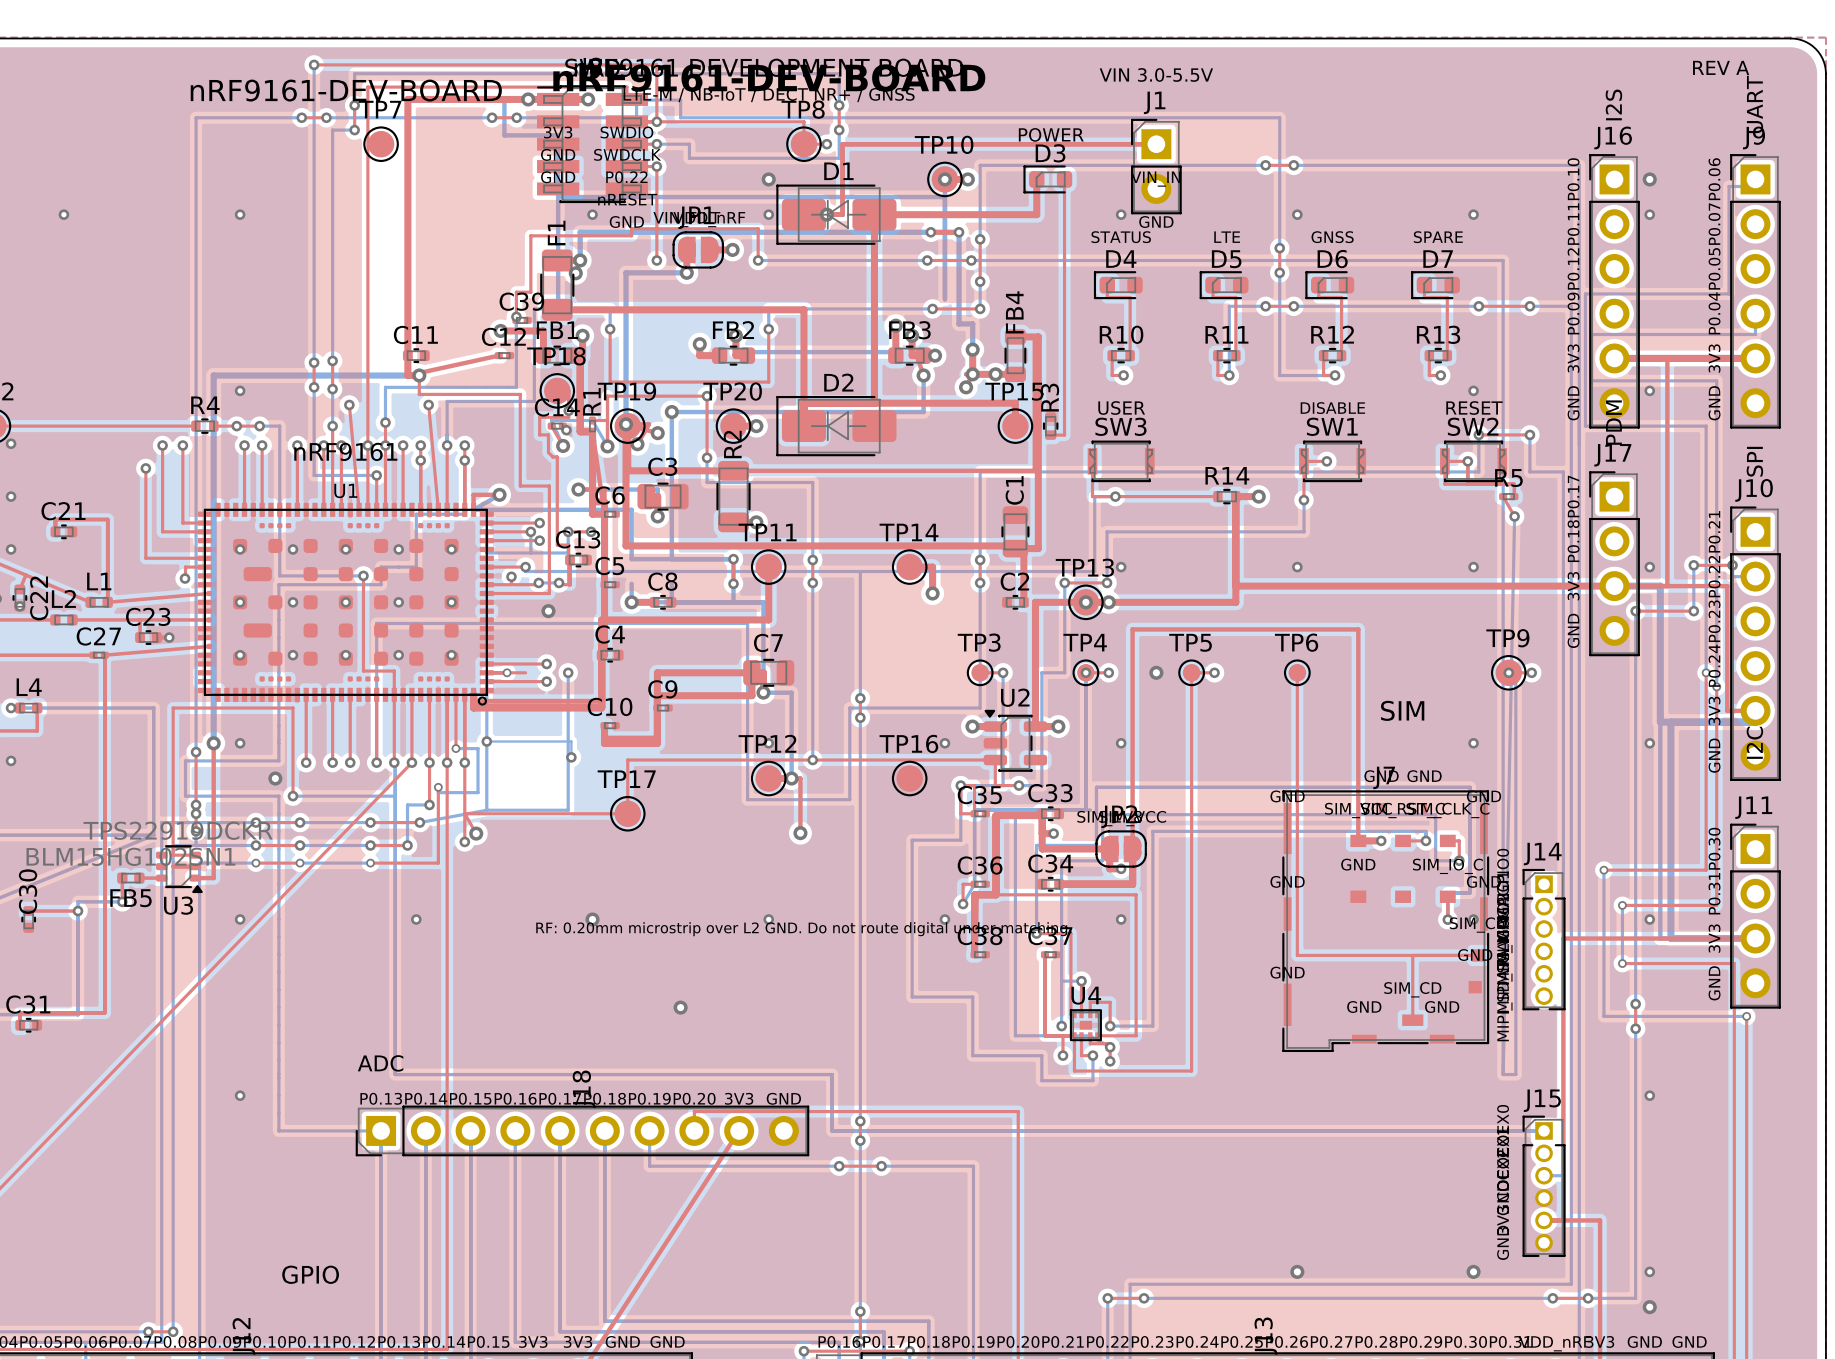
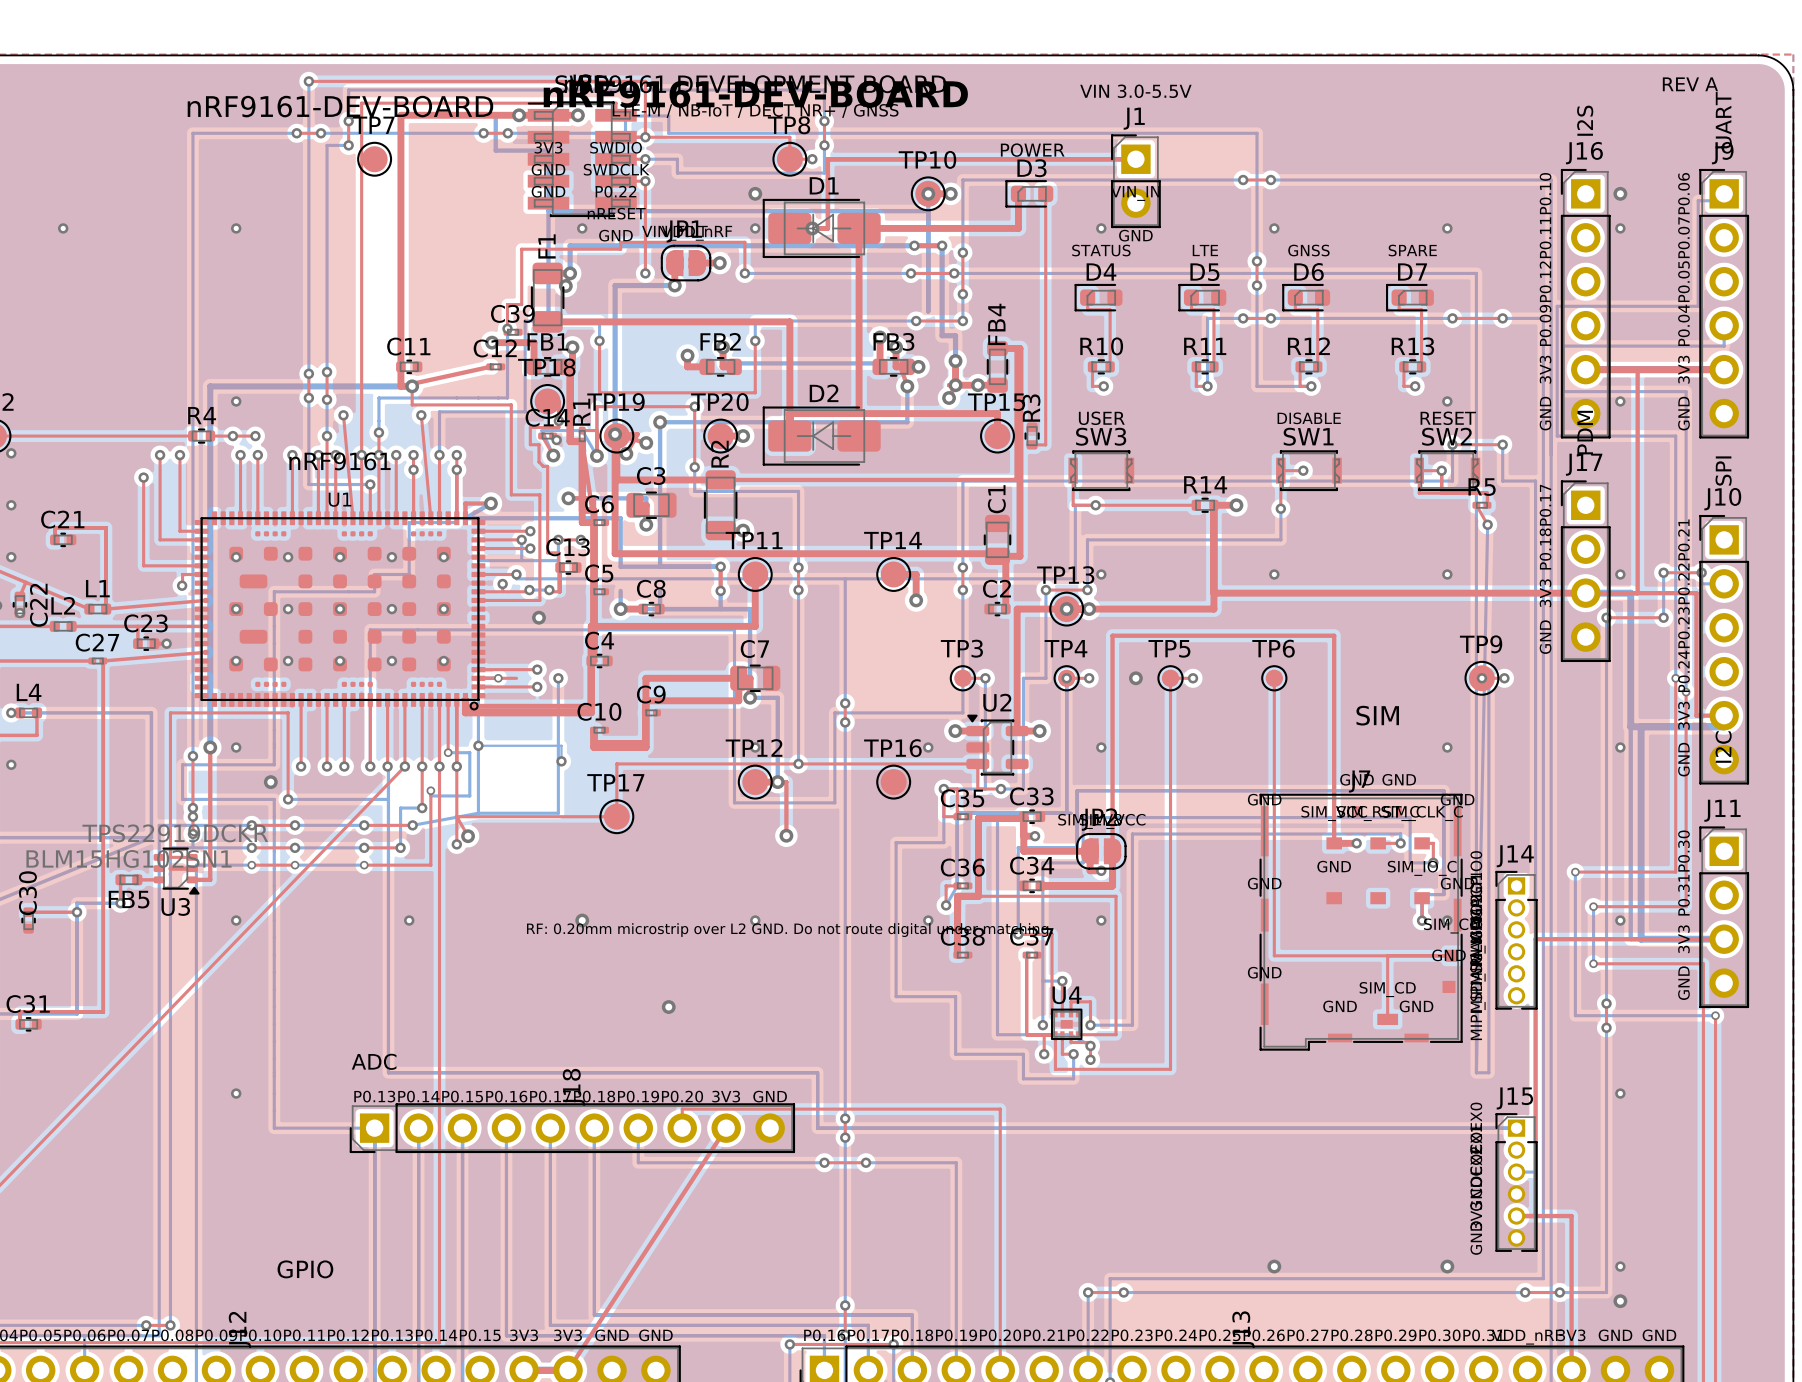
bottom track: (259, 426) (279, 426) (279, 575) (363, 575) -> none
top track: (363, 575) (363, 671) (394, 671) (394, 694) -> none
via: (363, 575) -> none

